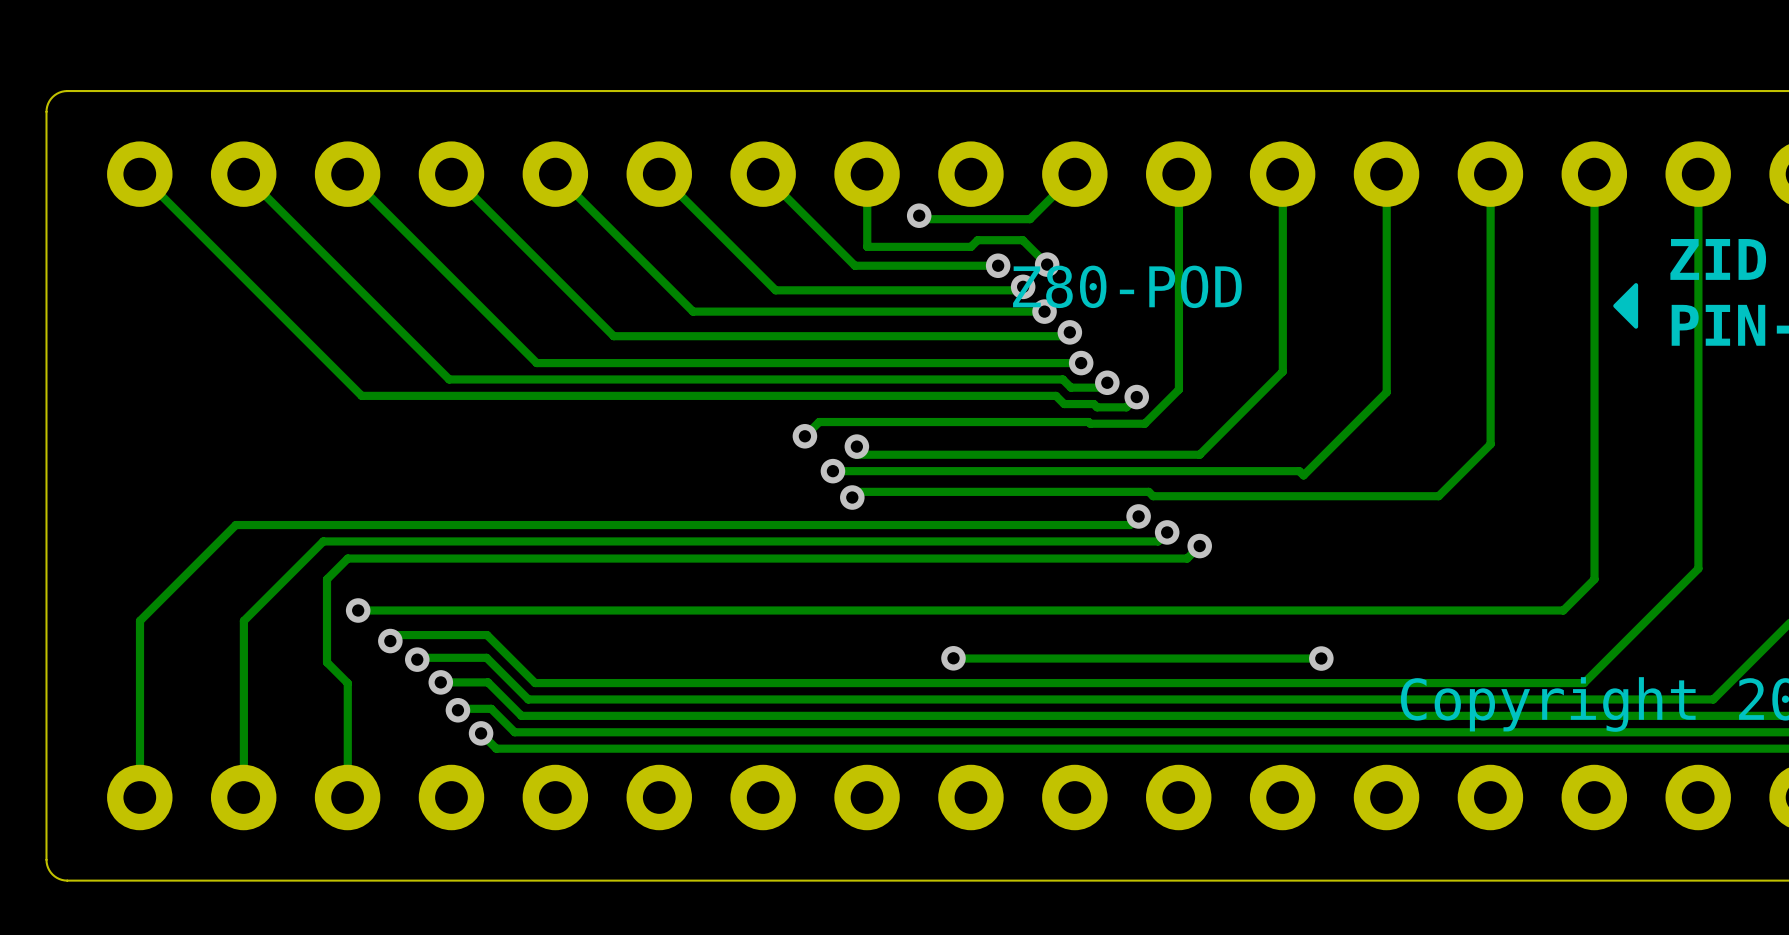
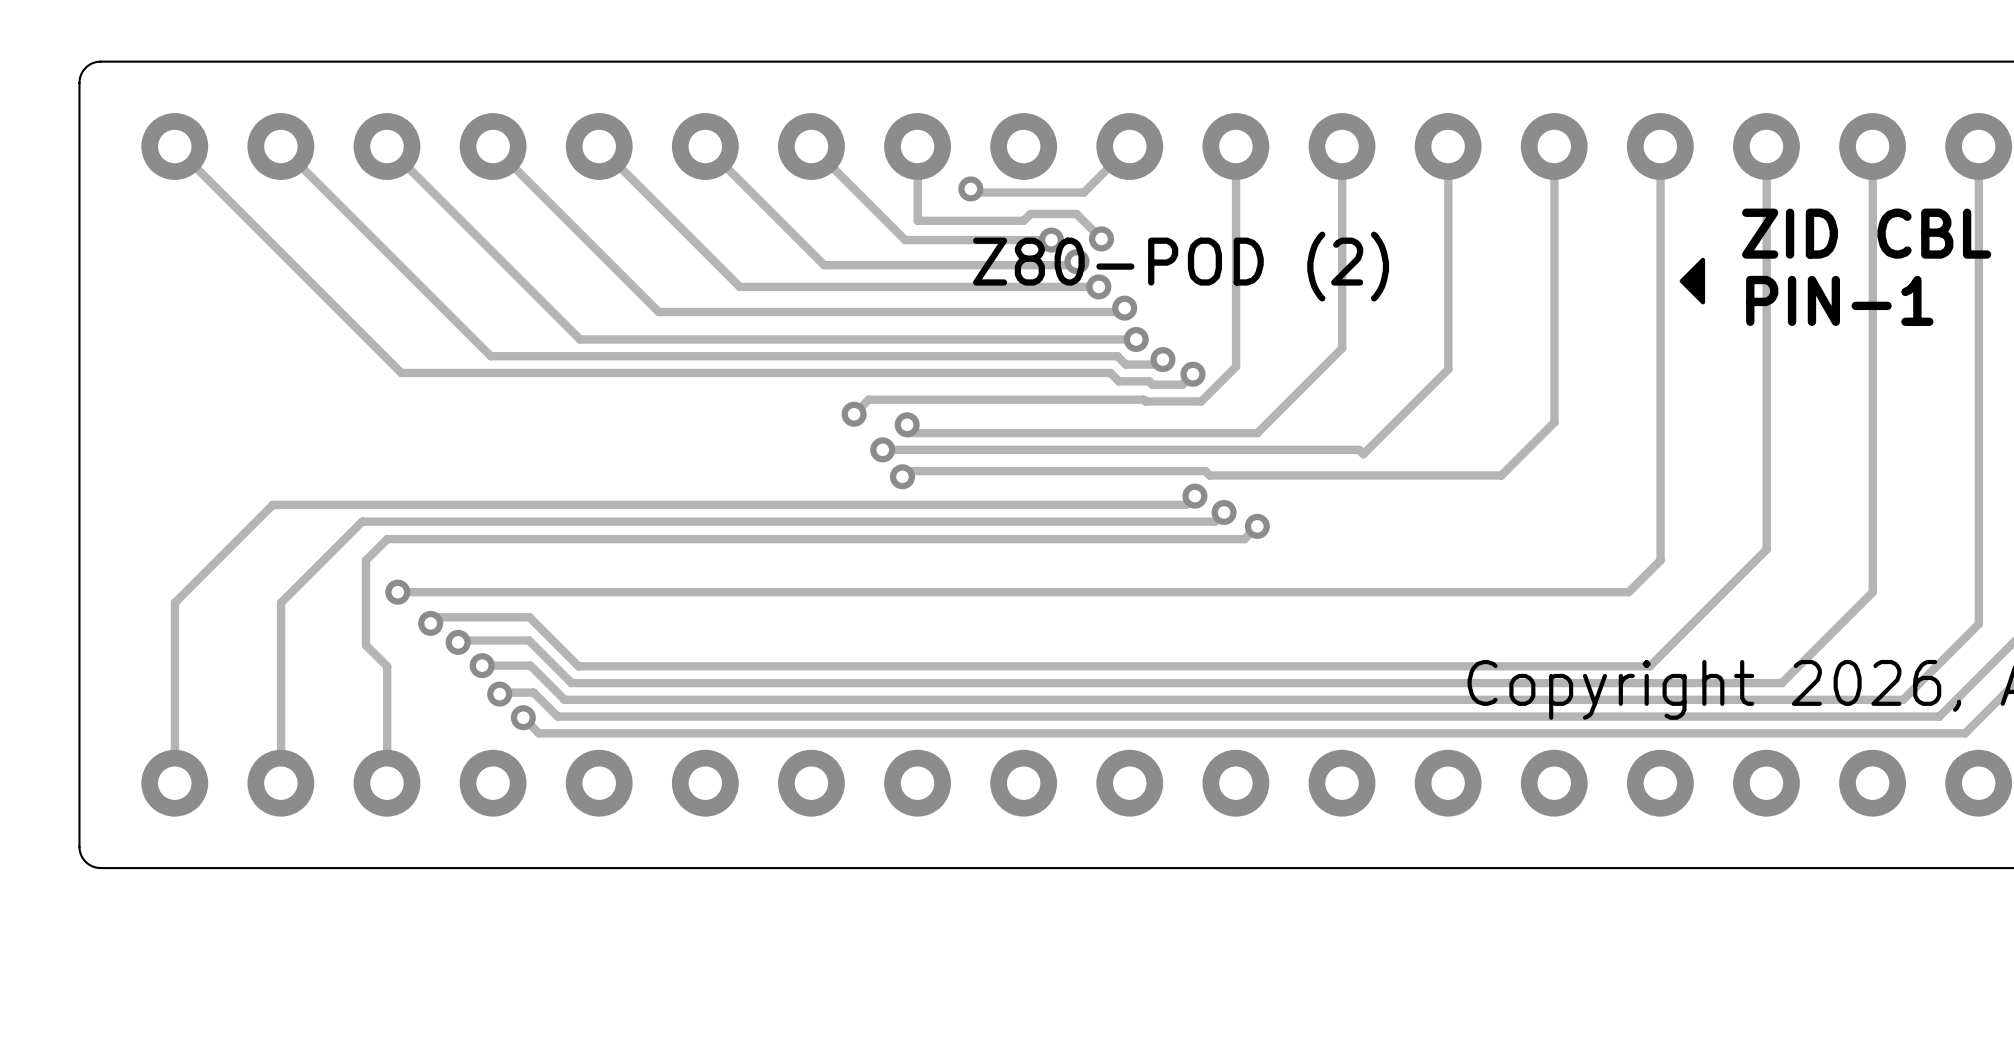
part value: Z80-POD (1127, 286) -> Z80-POD (2) (1181, 266)
via: (953, 658) -> none
track: (1321, 658) (953, 658) -> none
via: (1321, 658) -> none

